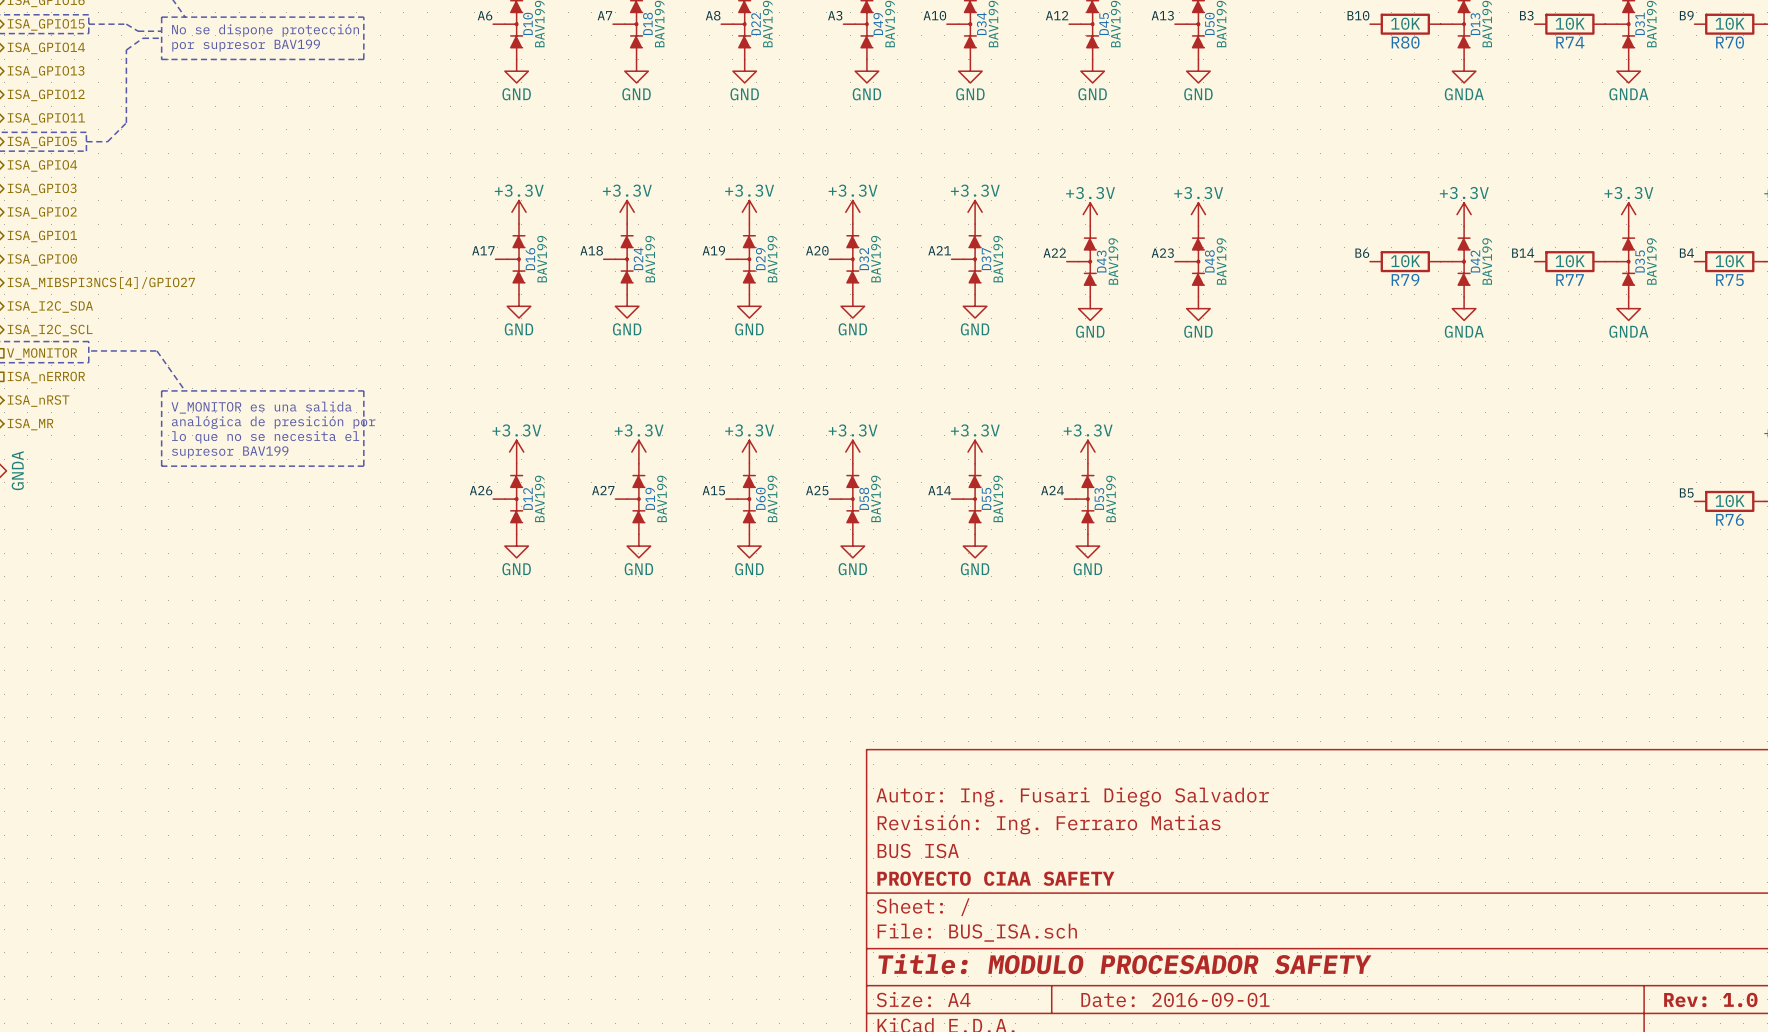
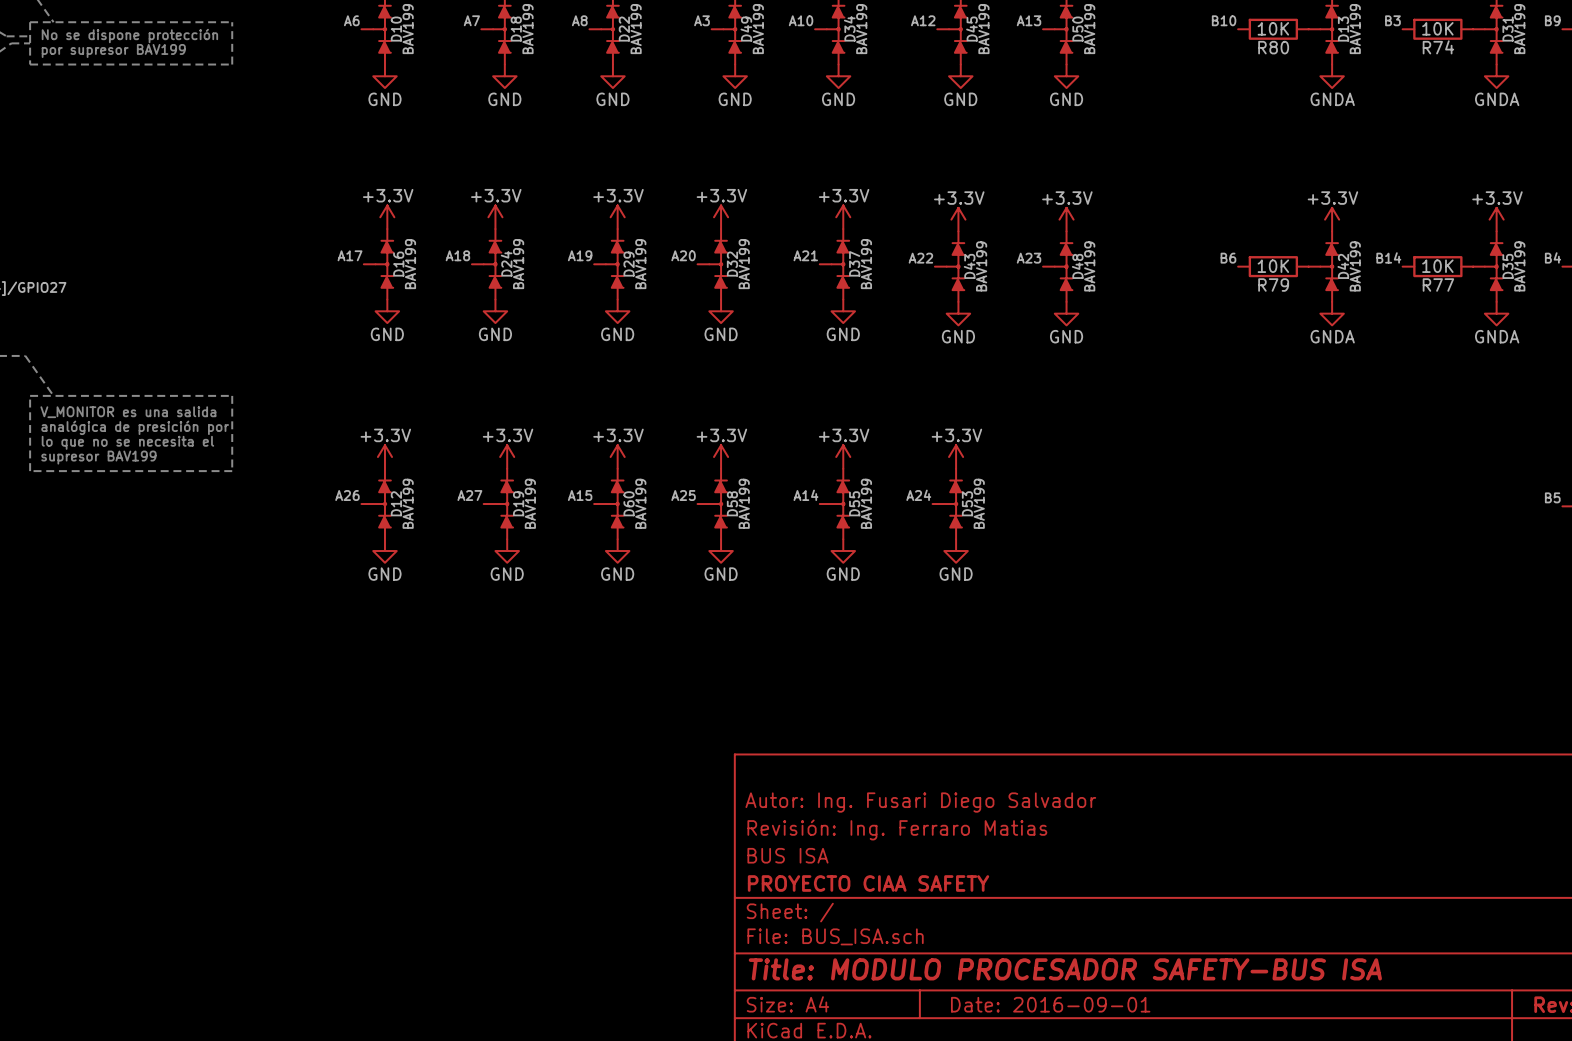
title block: Title: MODULO PROCESADOR SAFETY (1124, 964) -> Title: MODULO PROCESADOR SAFETY-BUS ISA (1065, 969)

